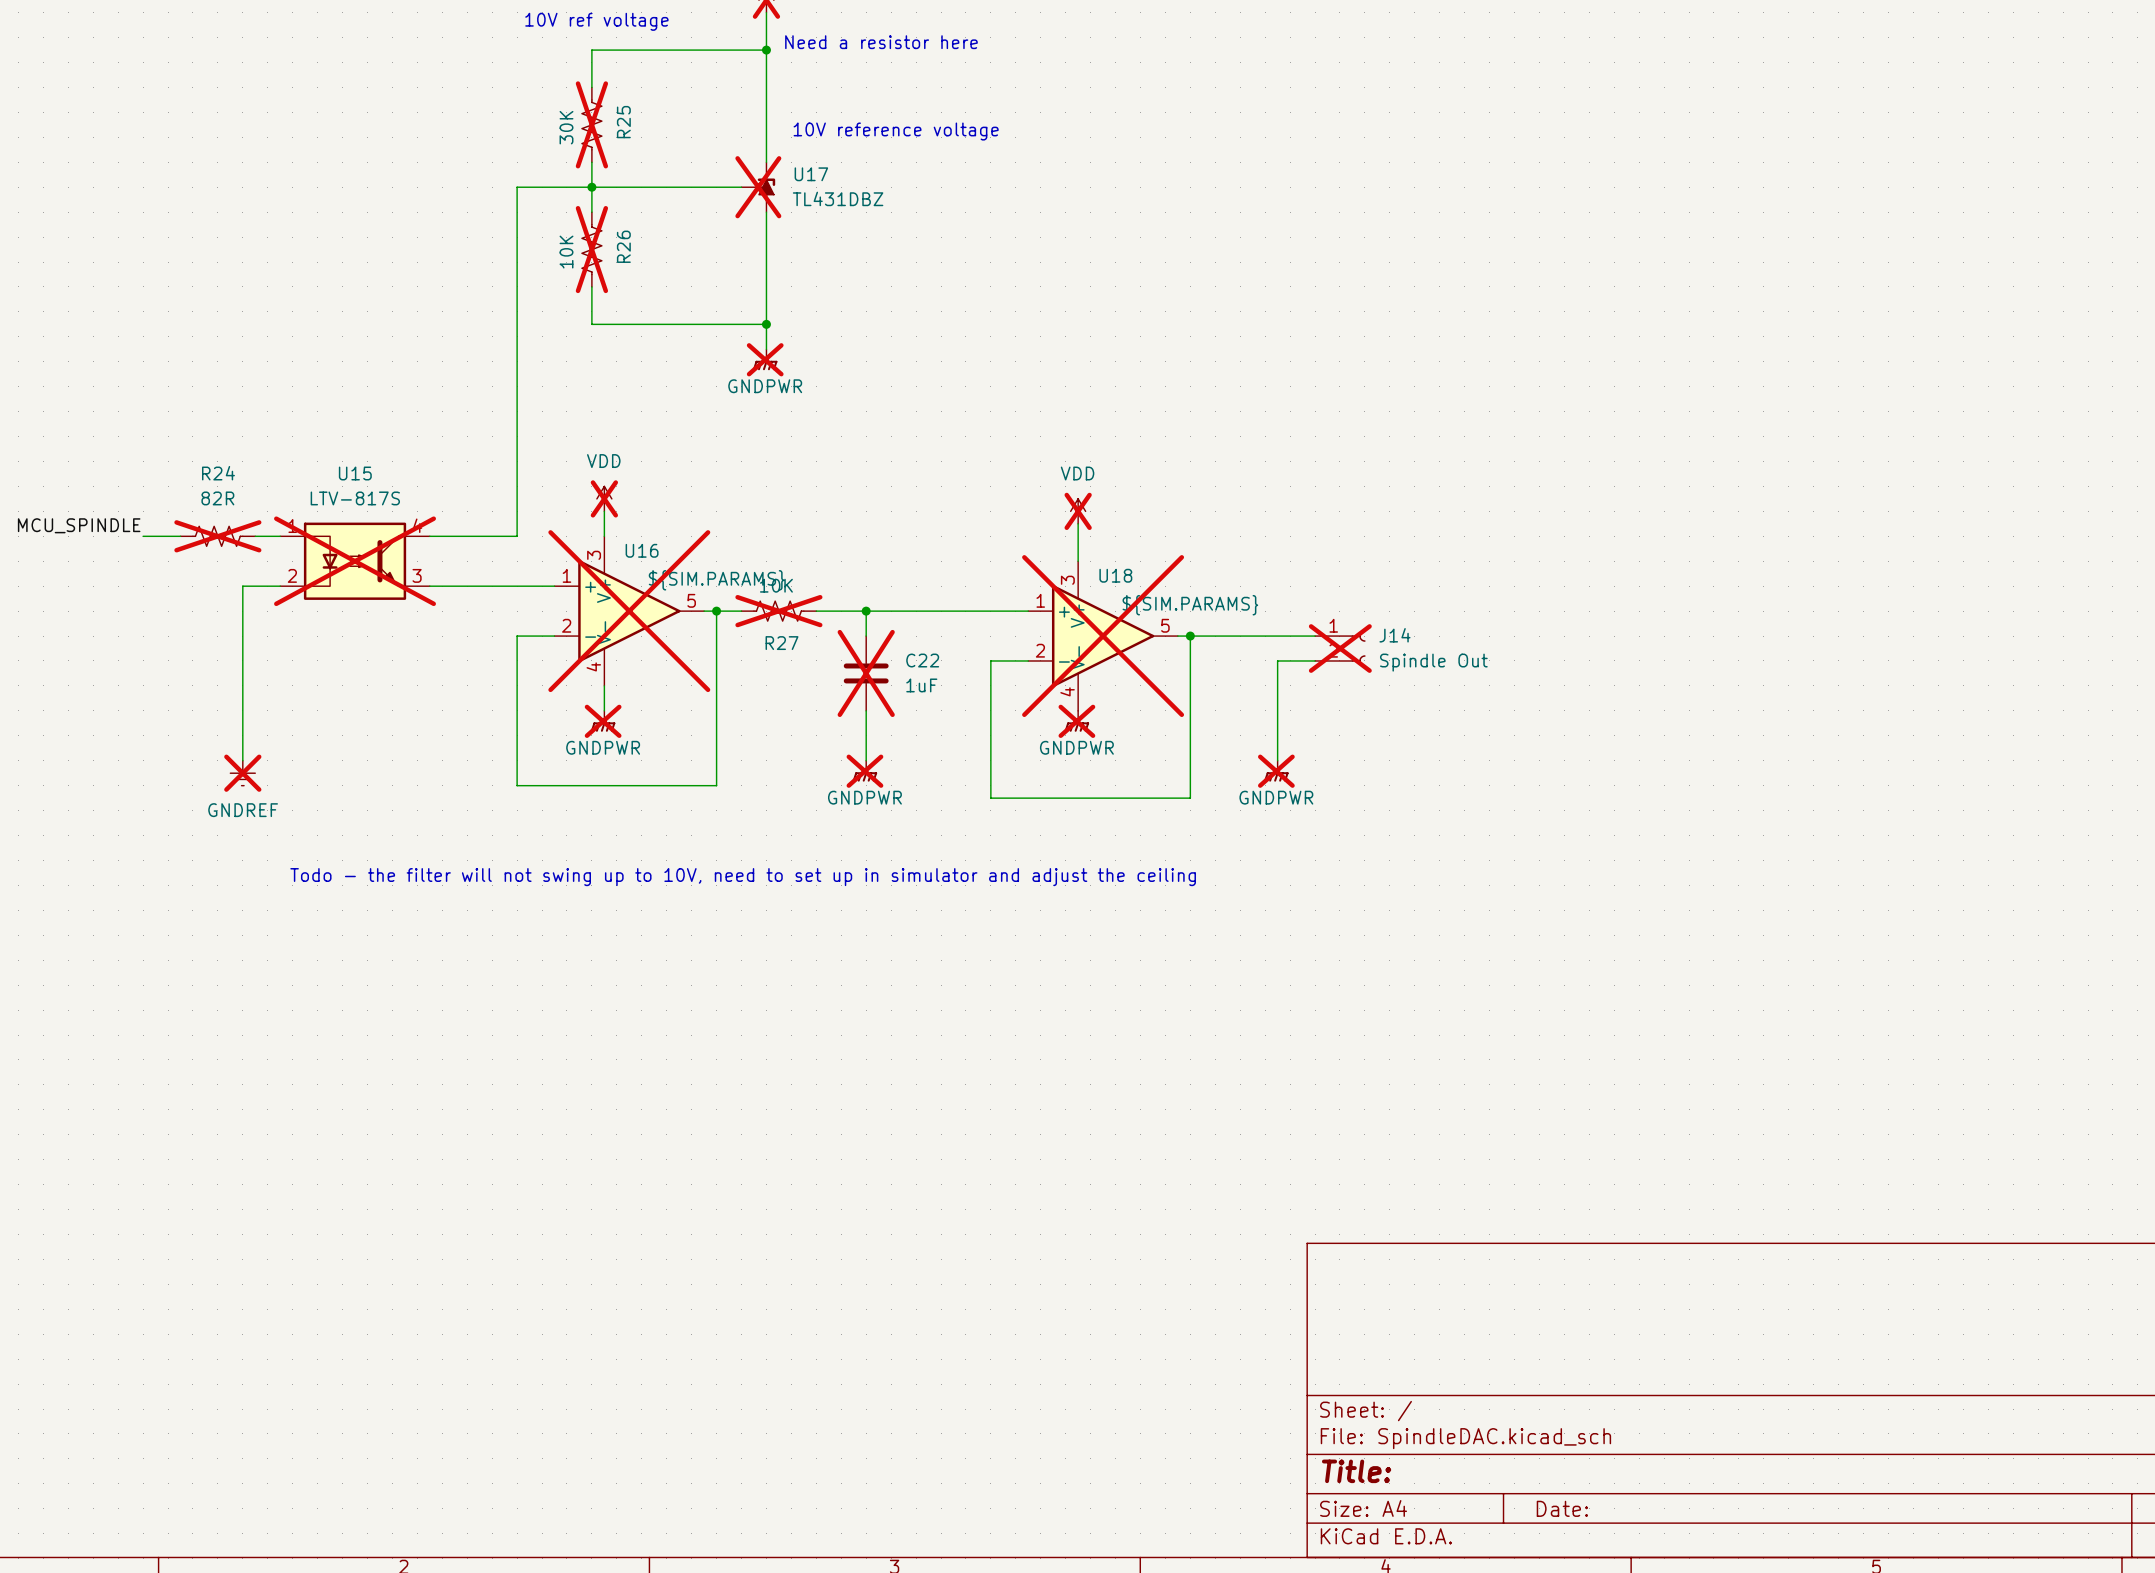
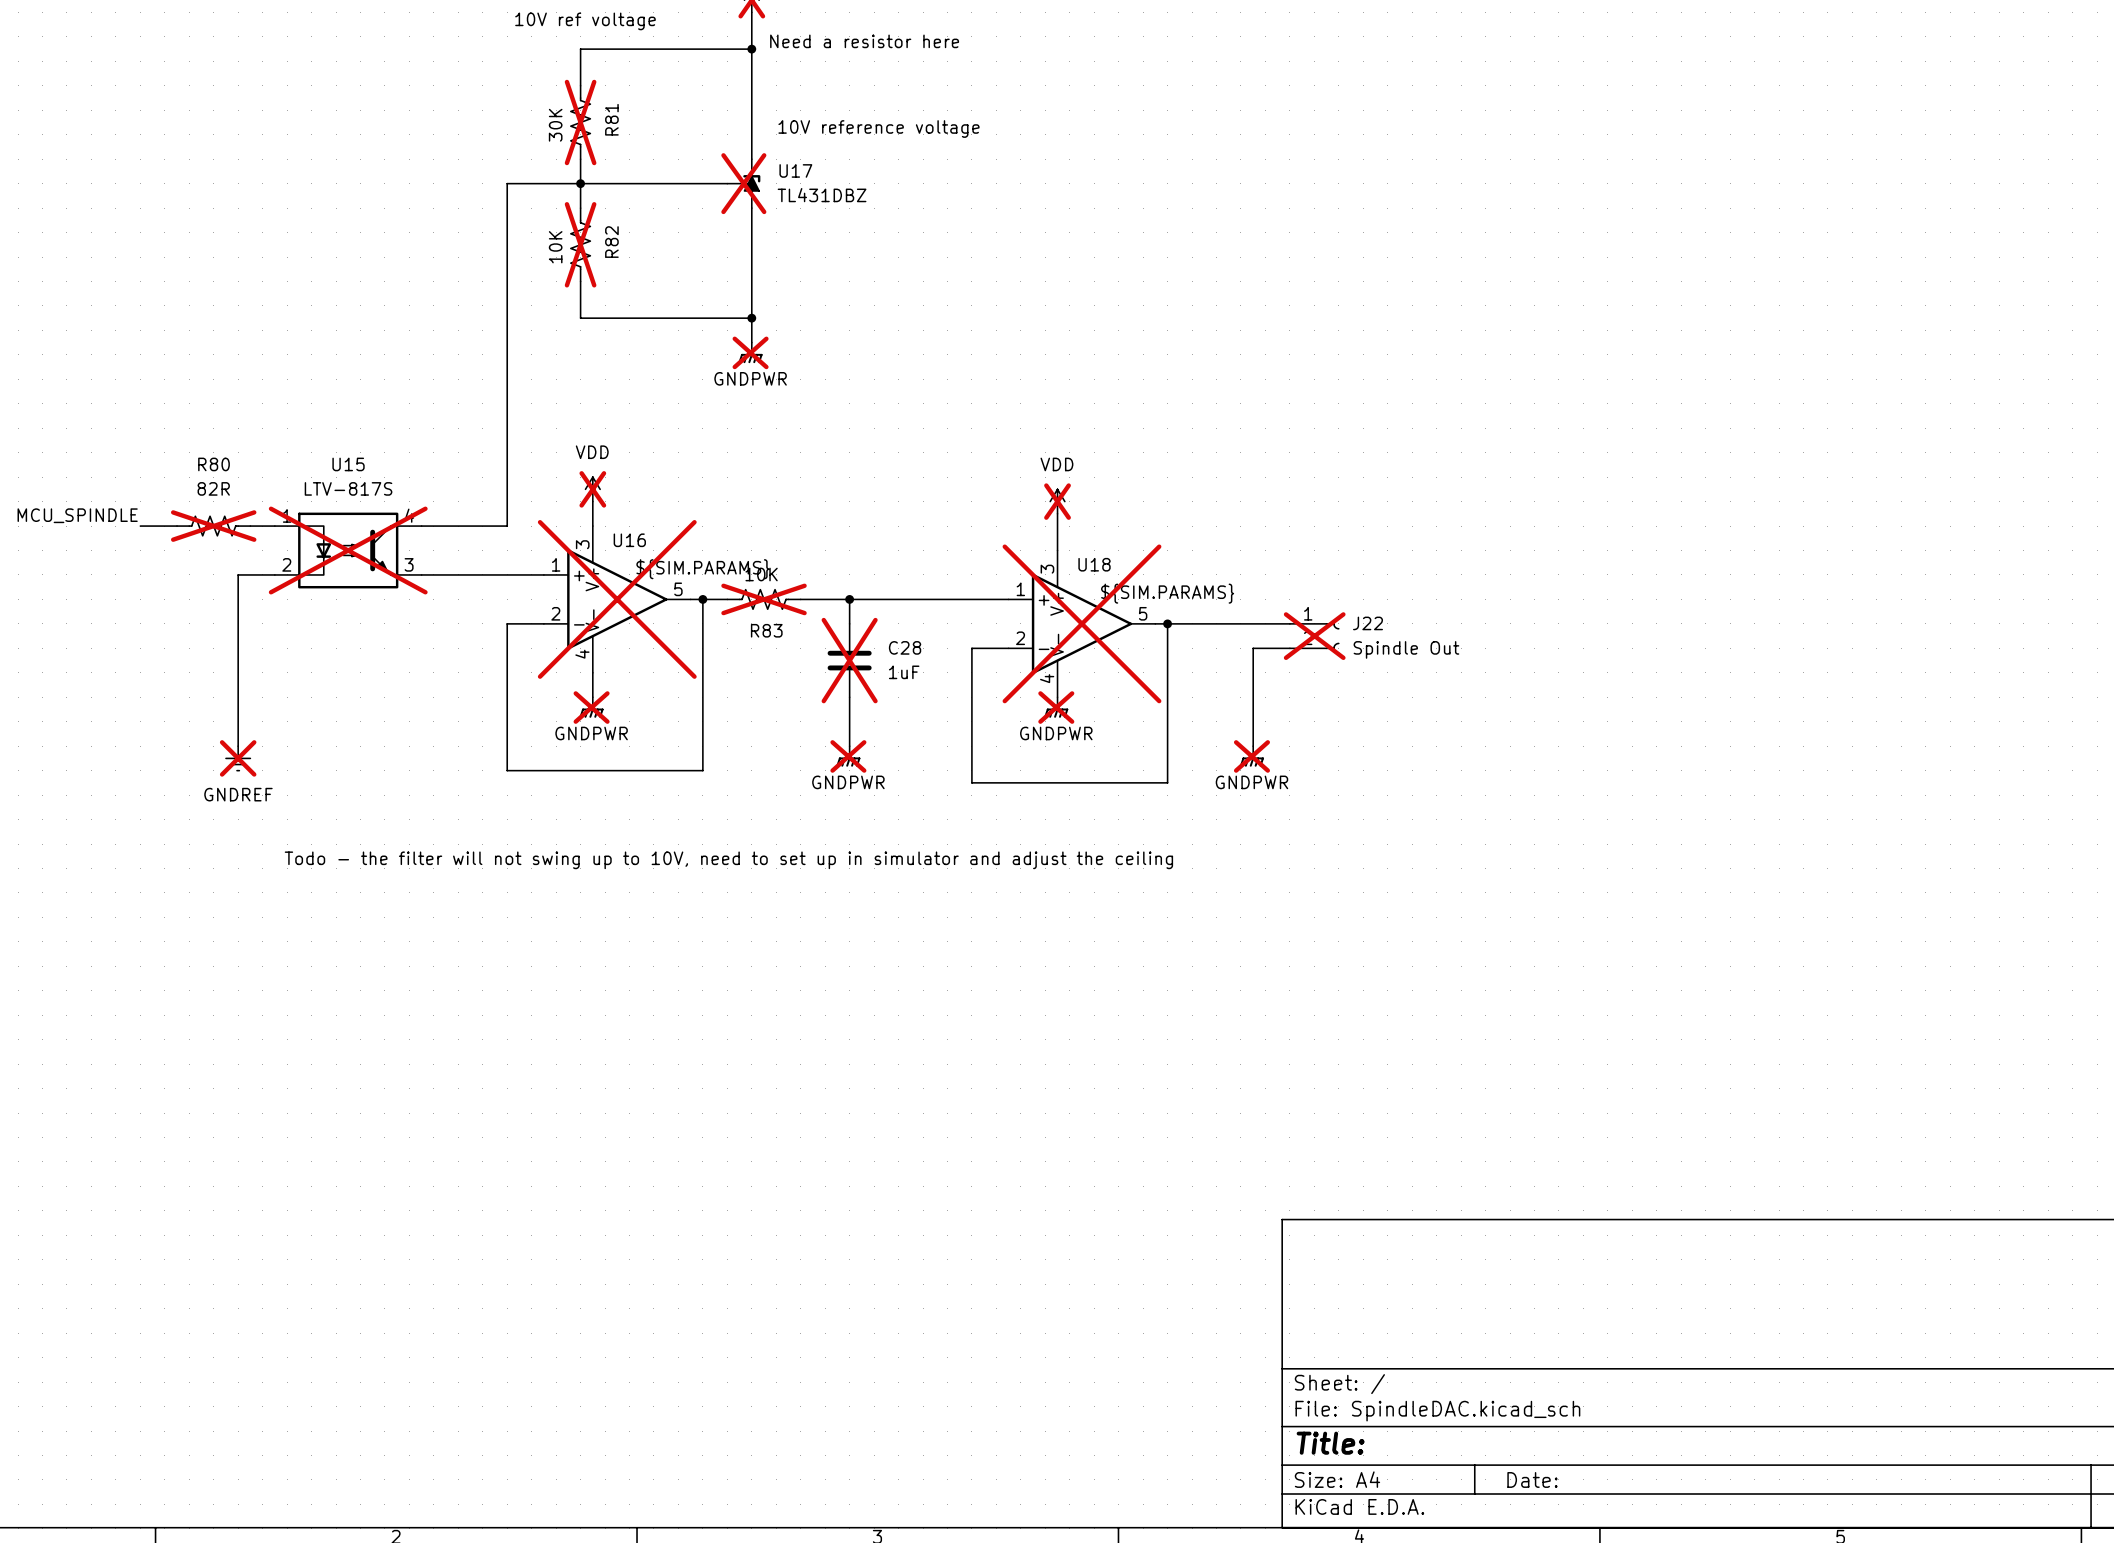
R25 name: R25 (623, 122) -> R81 (611, 119)
R26 name: R26 (623, 246) -> R82 (611, 242)
R24 name: R24 (218, 473) -> R80 (214, 464)
J14 name: J14 (1394, 635) -> J22 (1368, 623)
R27 name: R27 (782, 643) -> R83 (766, 630)
C22 name: C22 (922, 660) -> C28 (905, 647)

